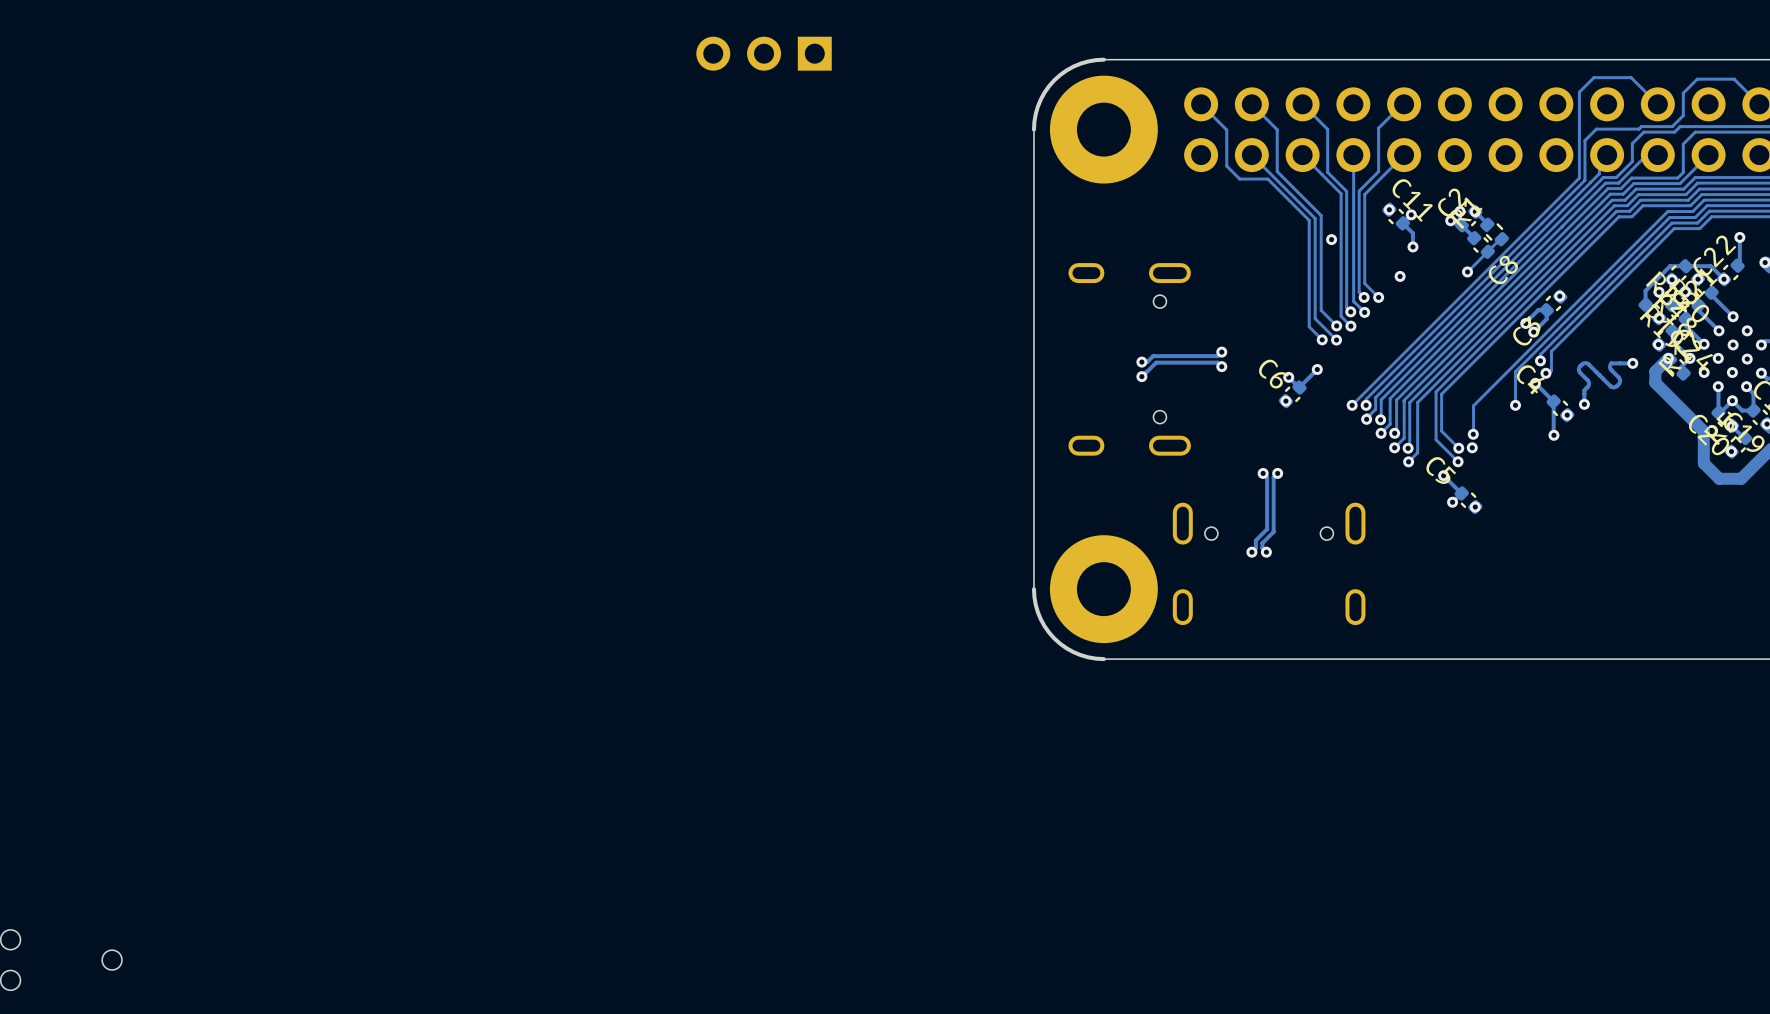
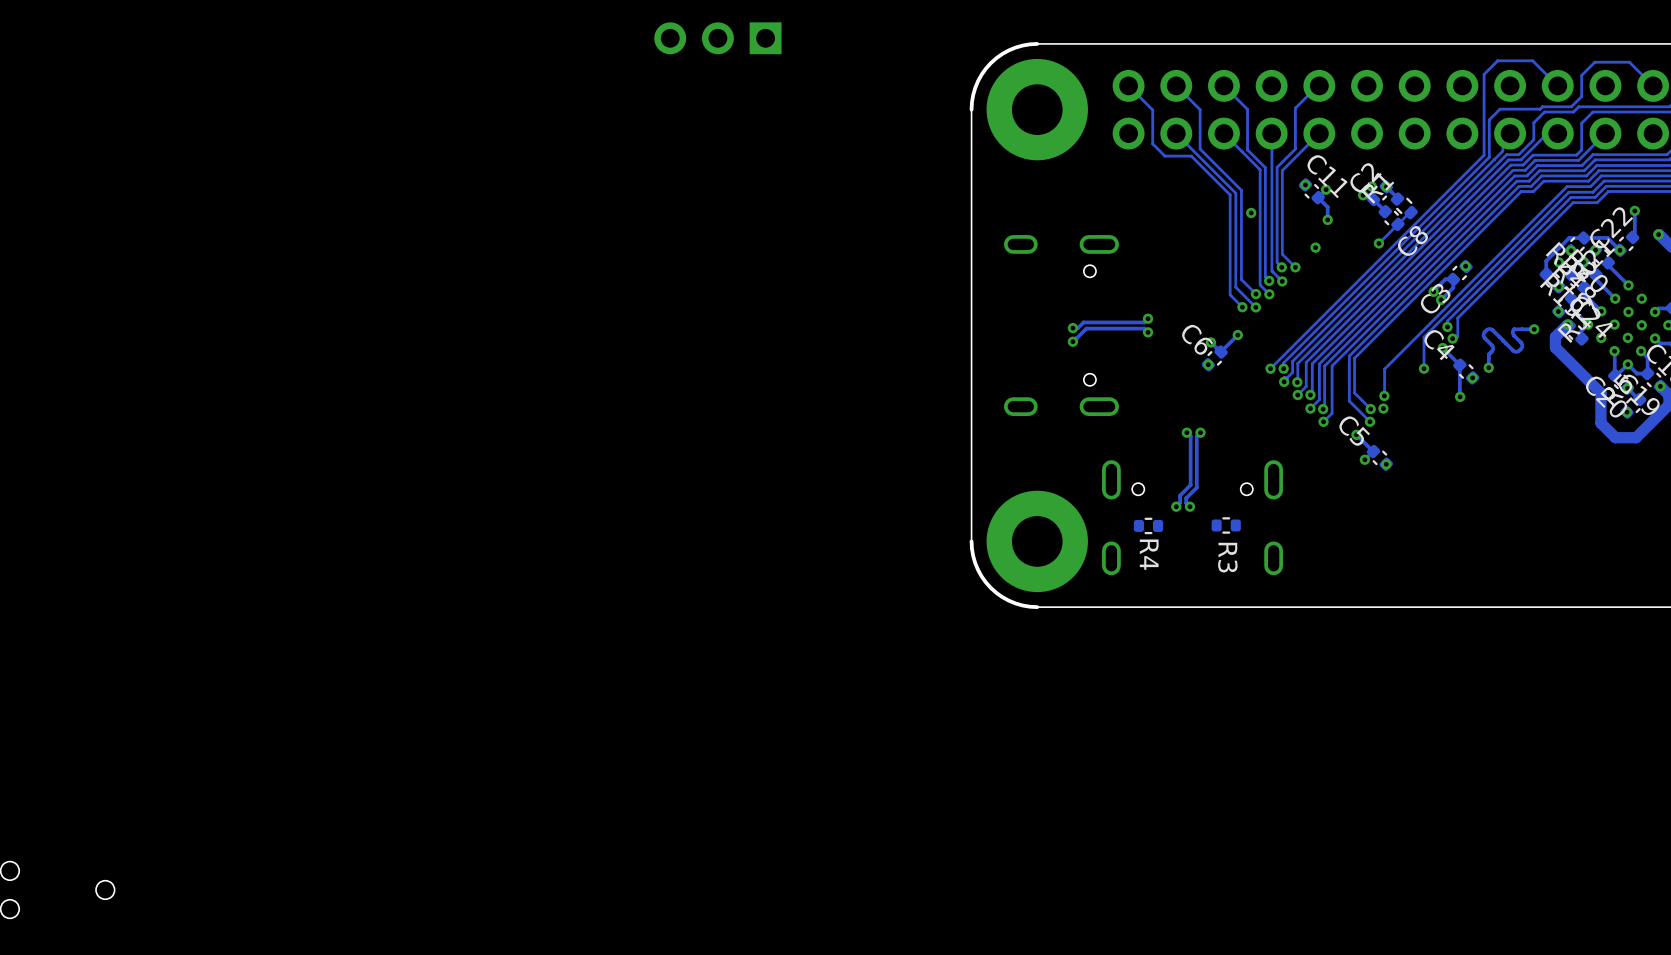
R4: none -> (1148, 525)
R3: none -> (1226, 525)

